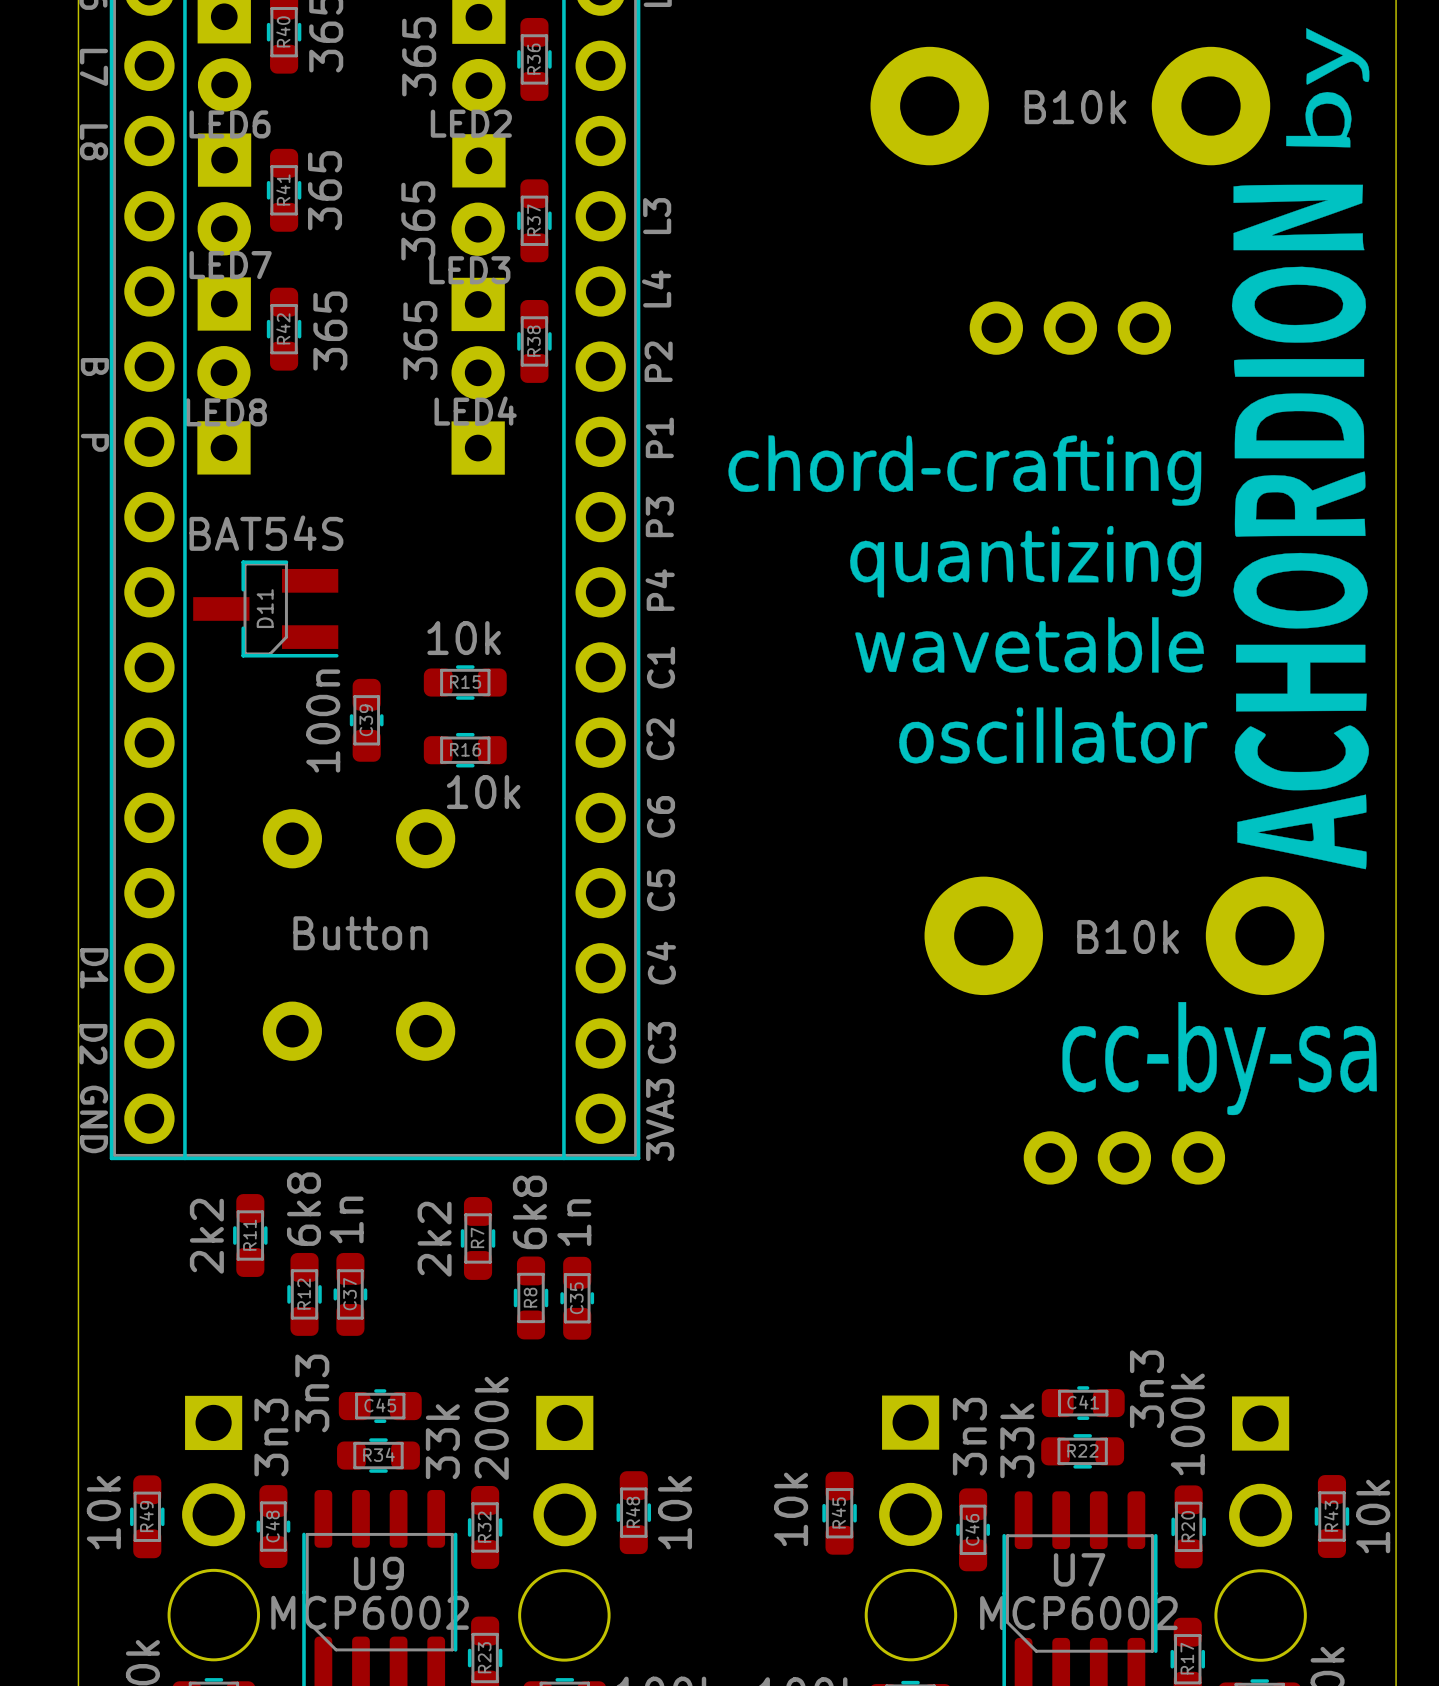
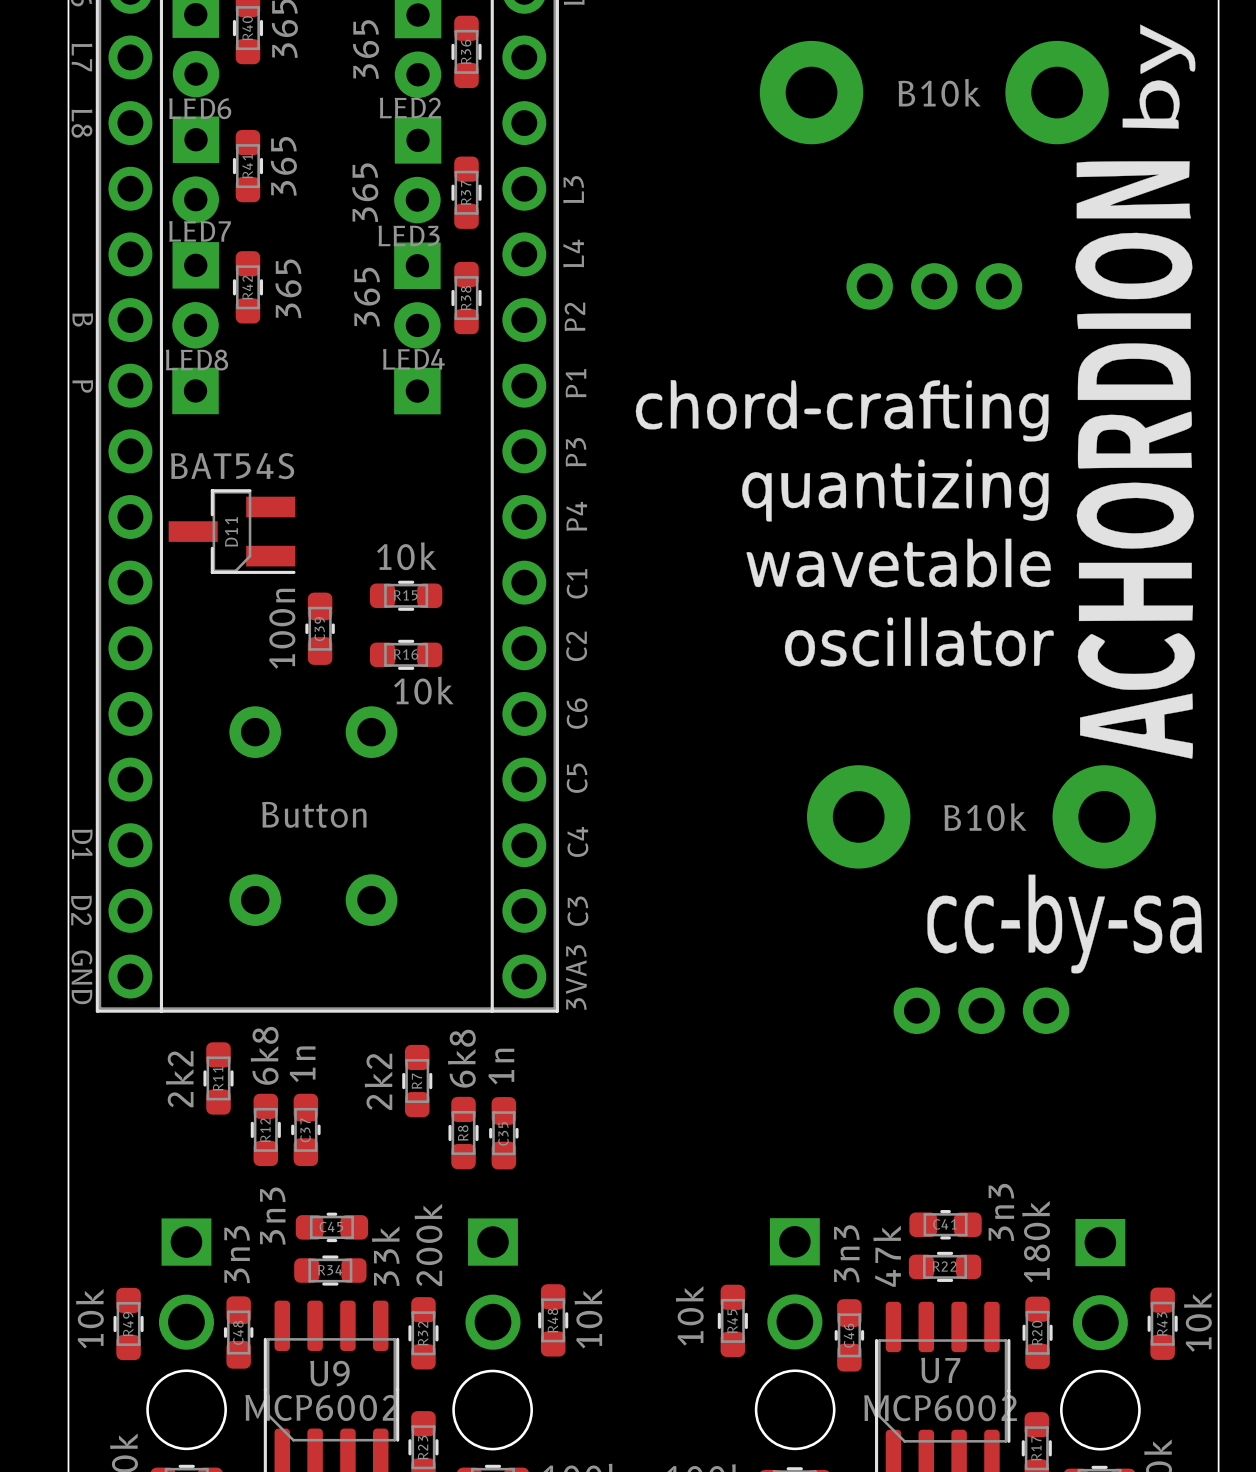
R20 value: 100k (1187, 1424) -> 180k (1036, 1241)
R22 value: 33k (1017, 1440) -> 47k (887, 1256)

